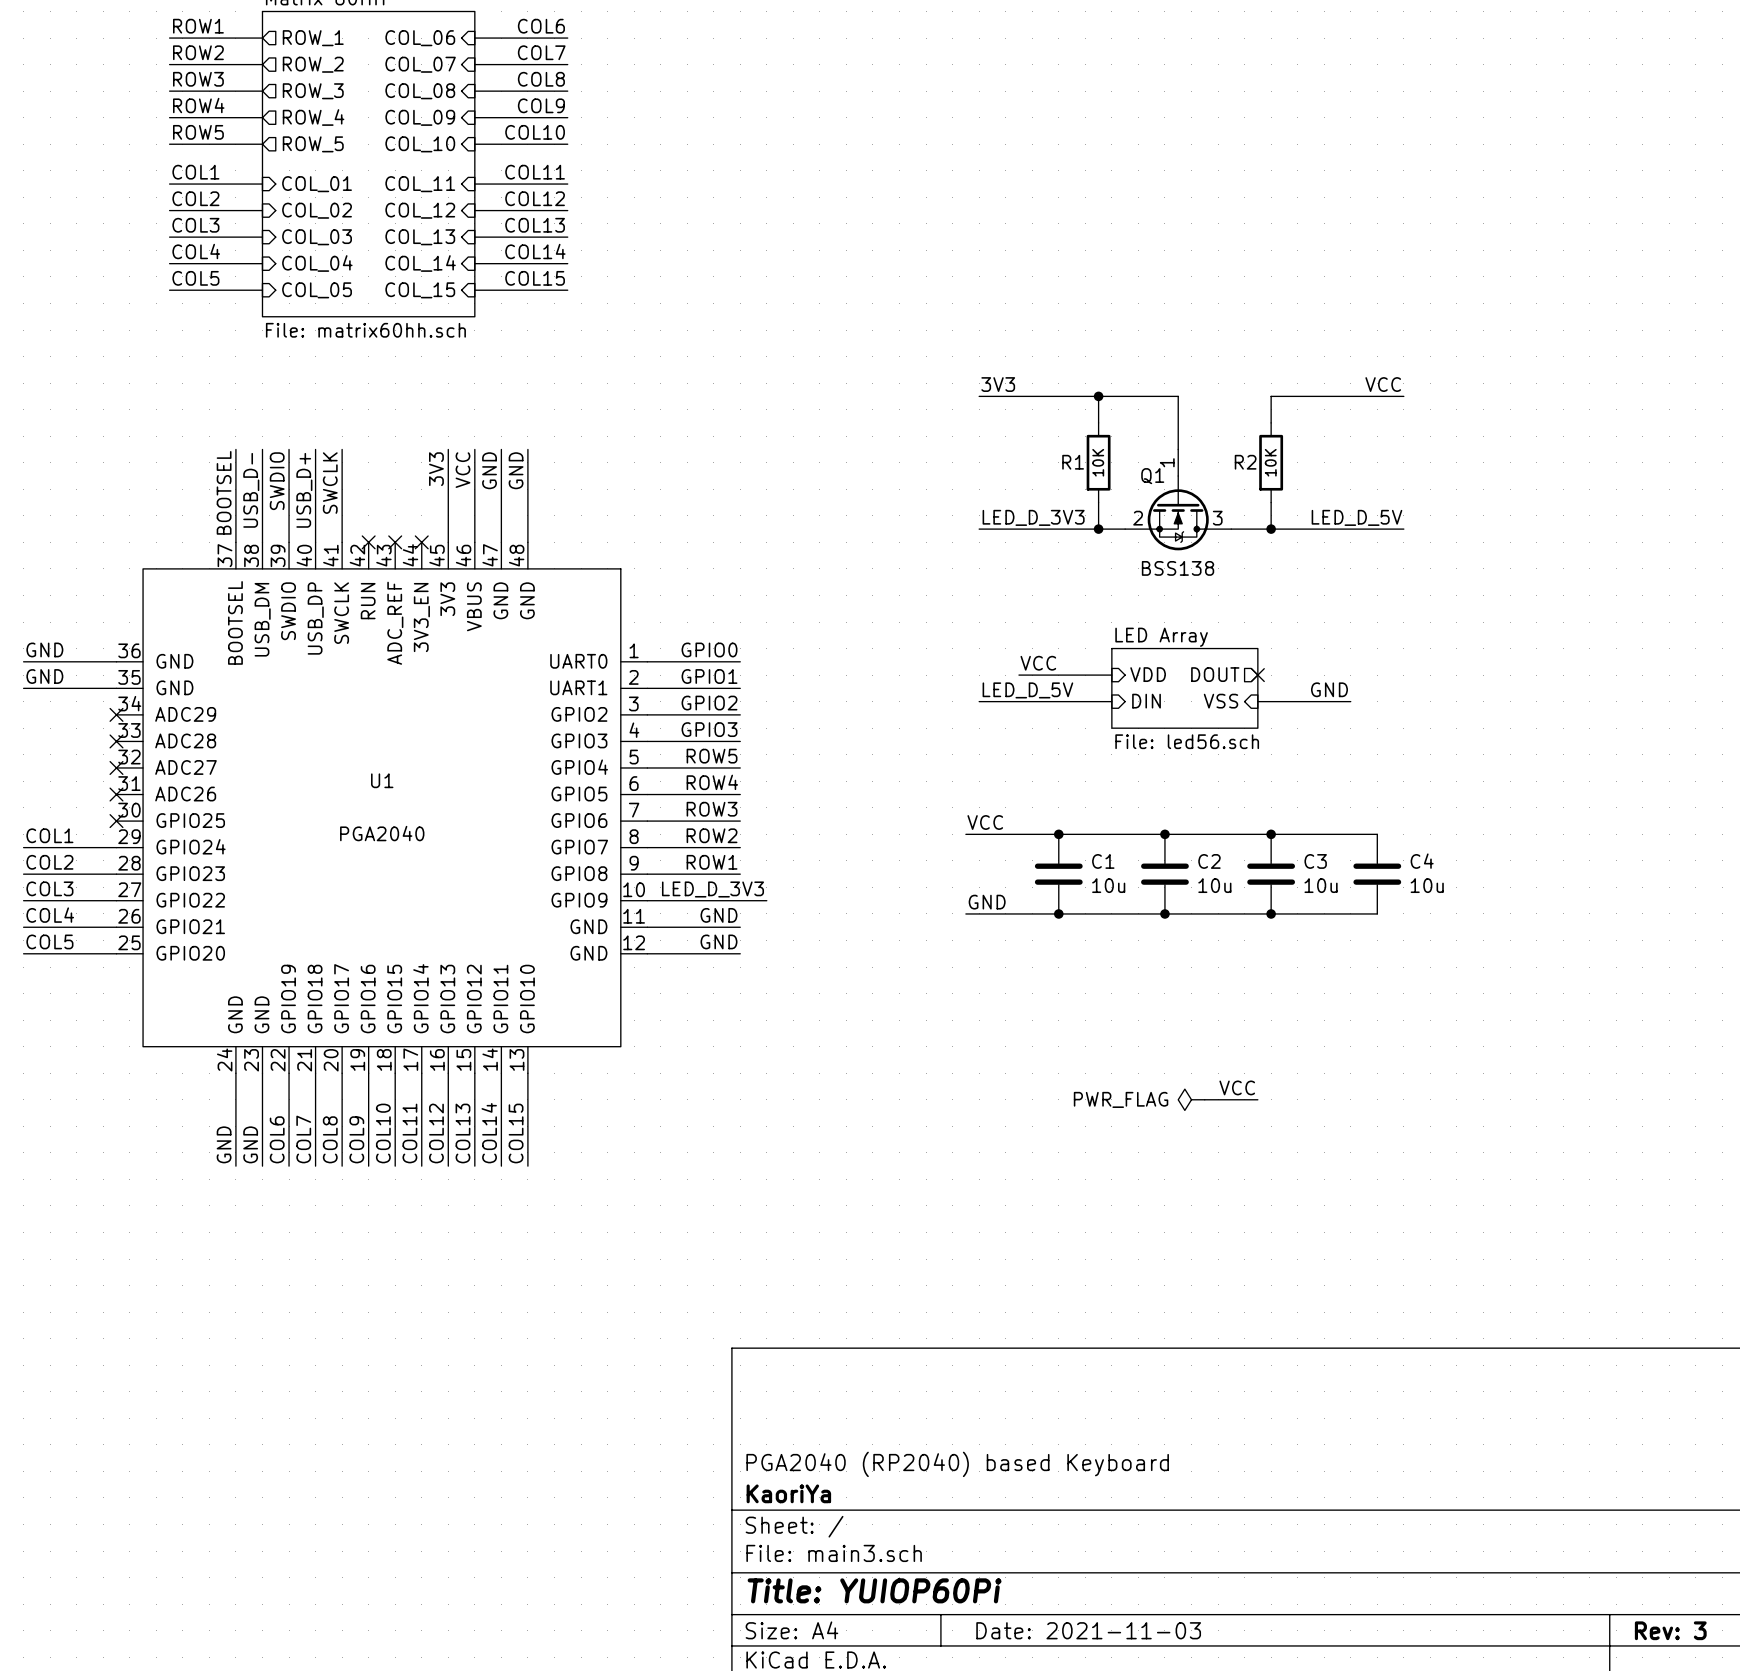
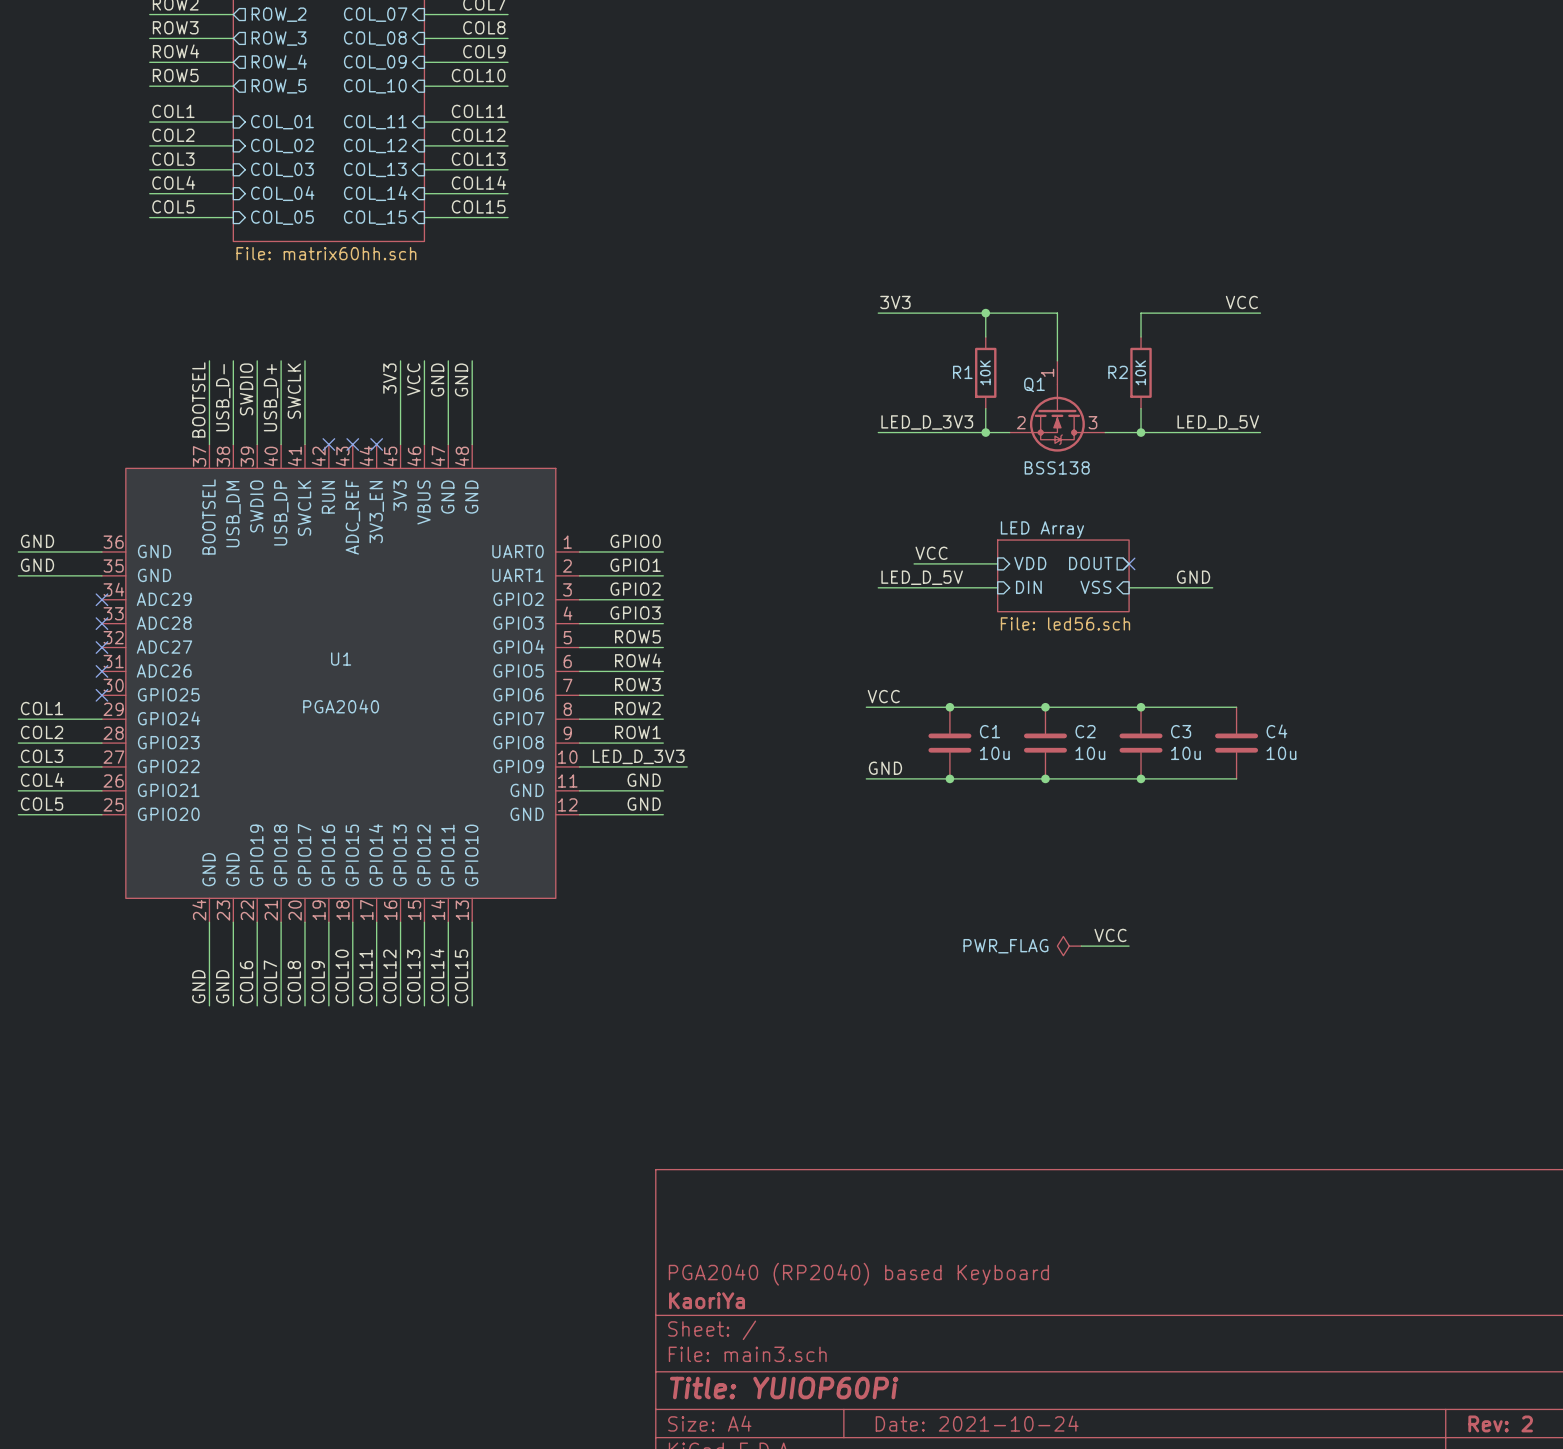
title block: Date: 2021-11-03 (1088, 1630) -> Date: 2021-10-24 (977, 1423)
title block: Rev: 3 (1670, 1630) -> Rev: 2 (1500, 1423)

